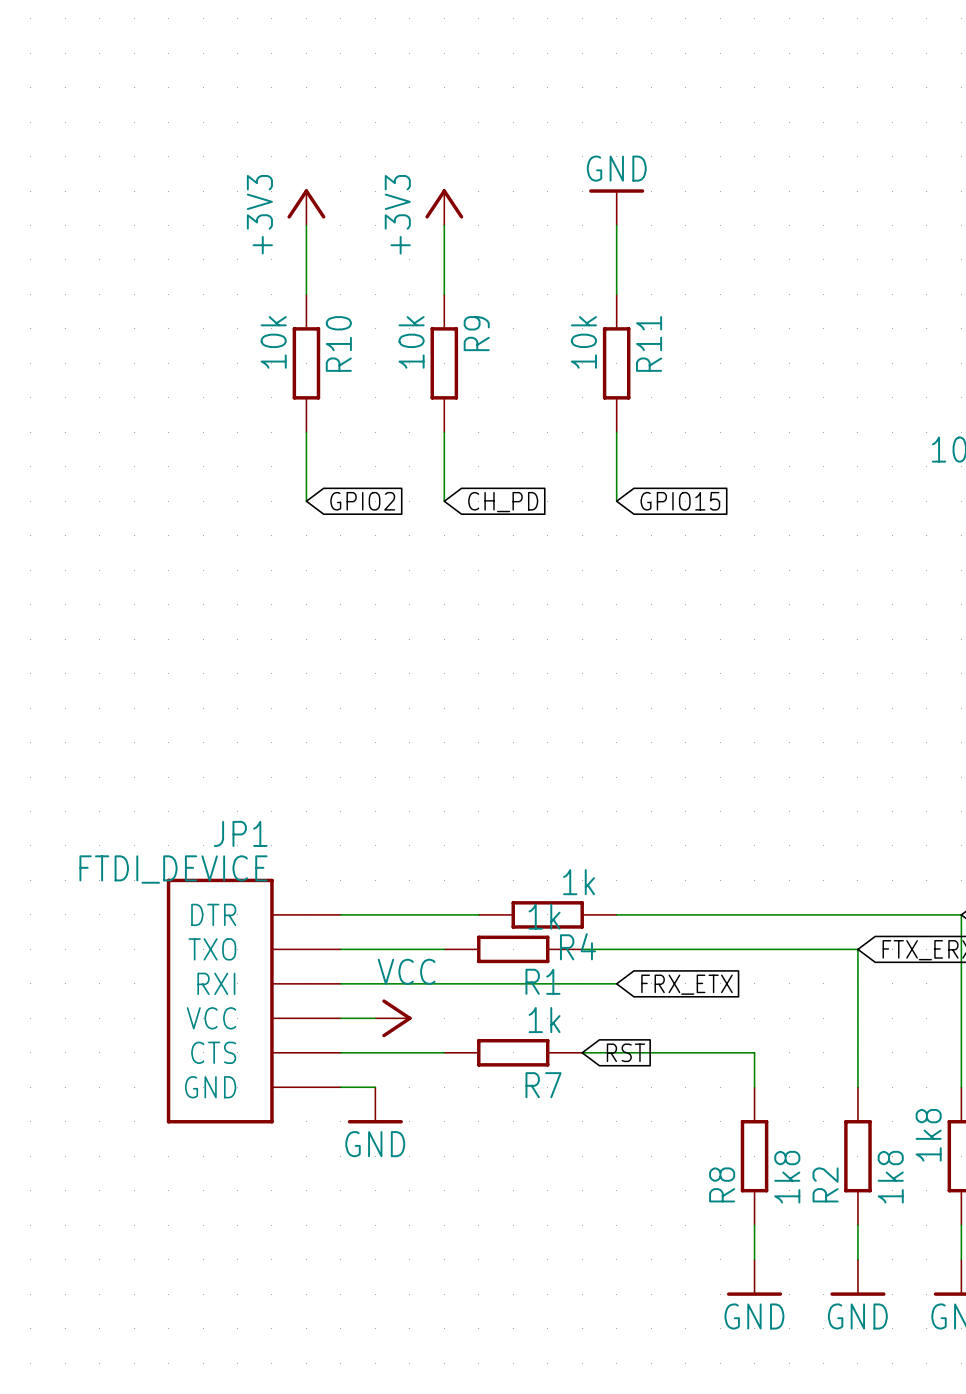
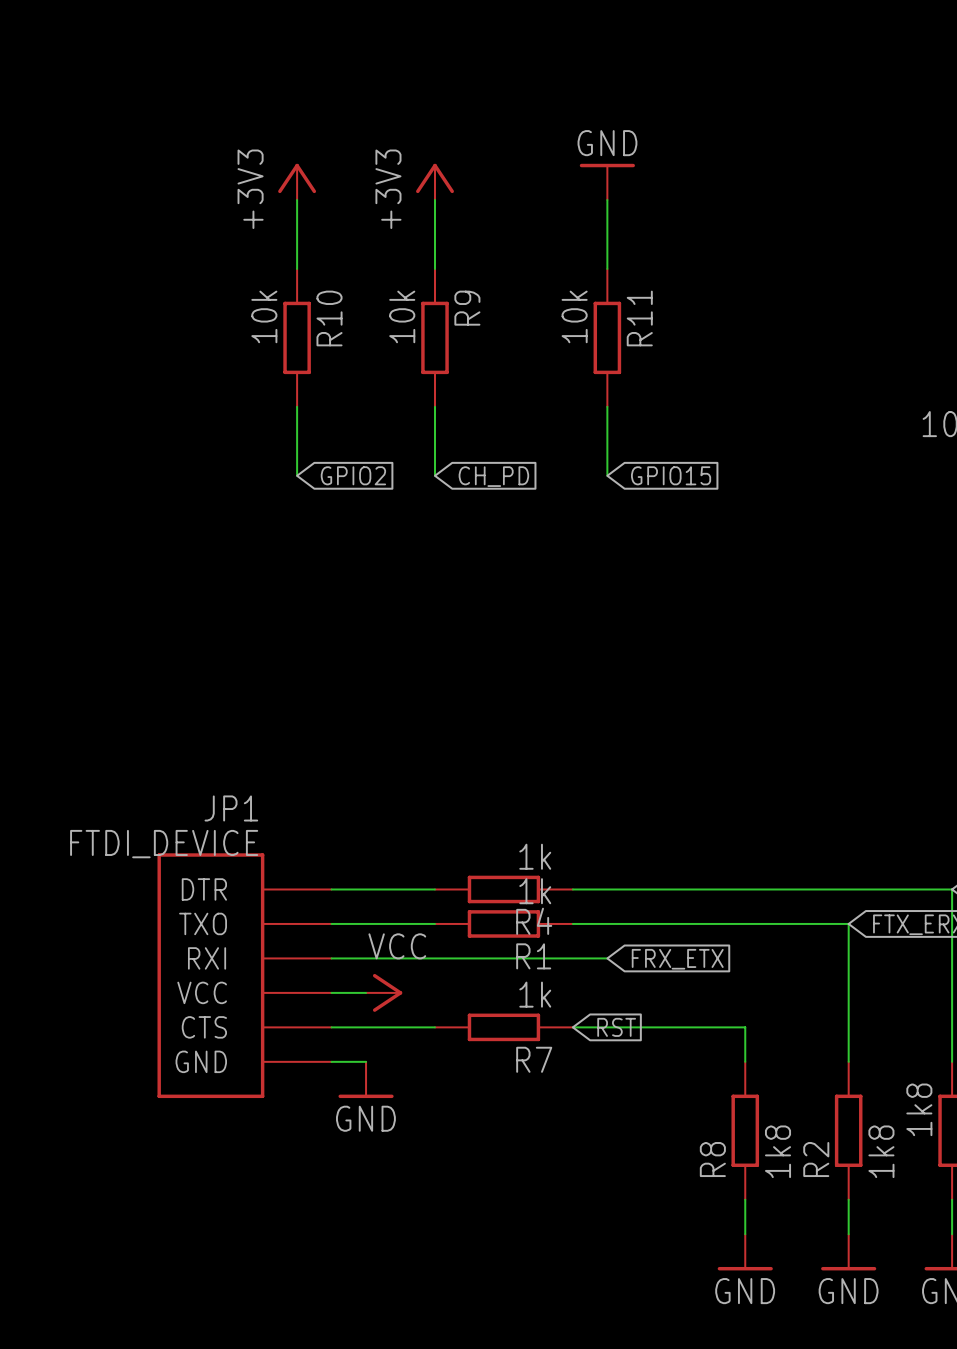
R4 position: (547, 914) -> (503, 889)

